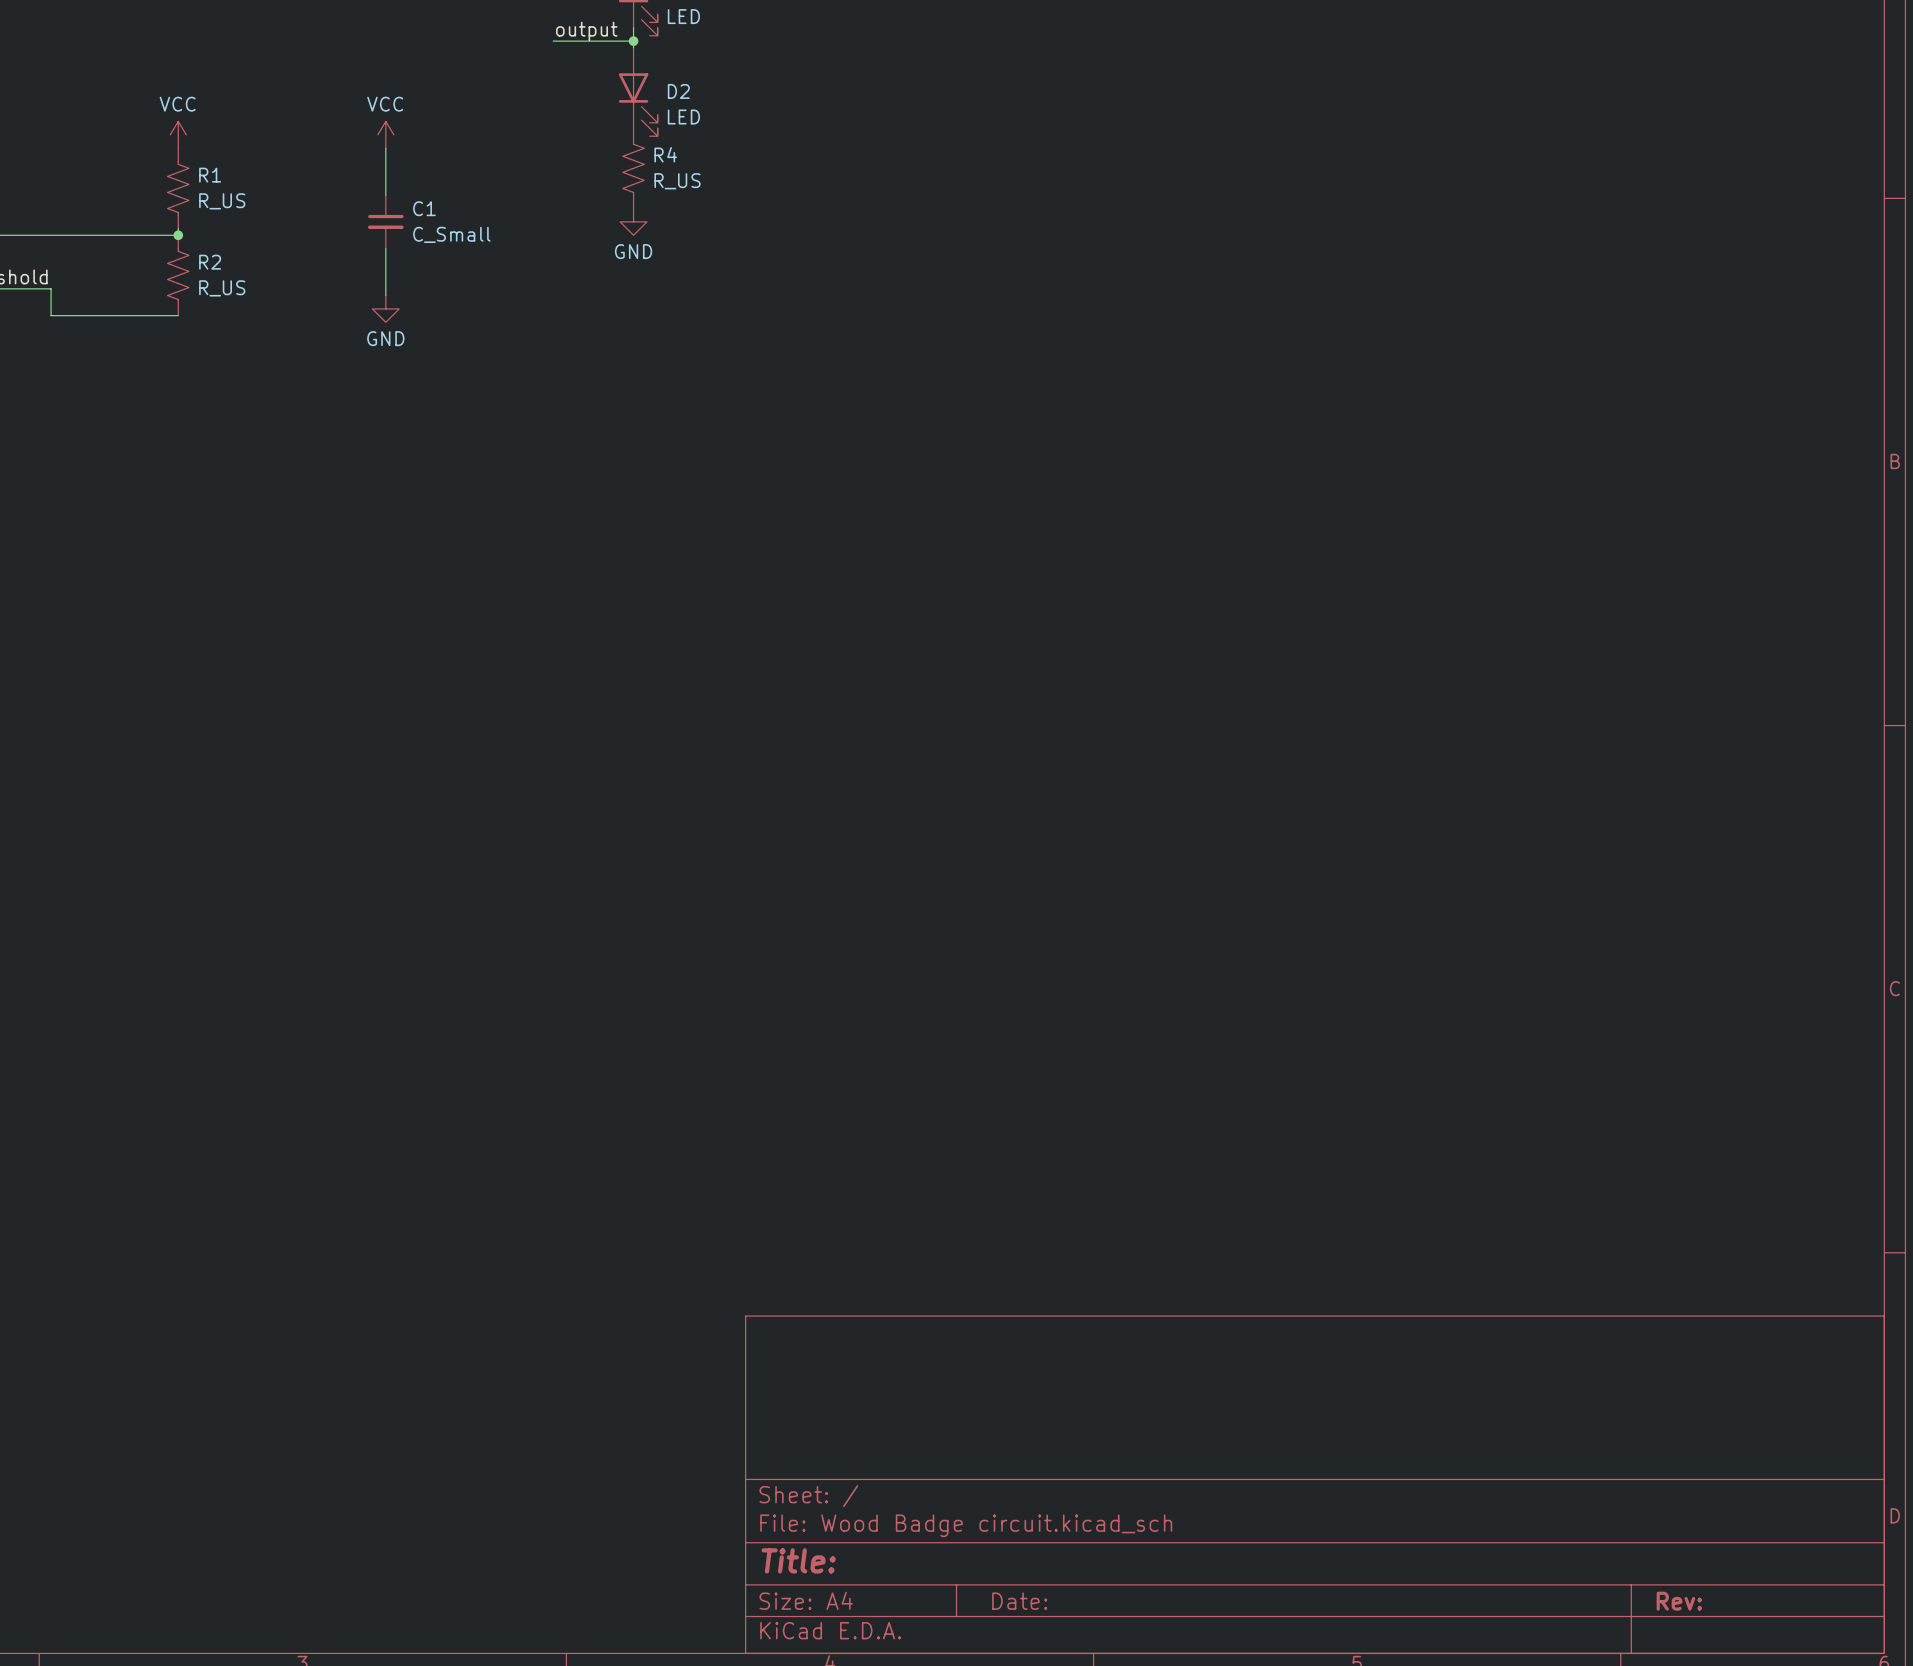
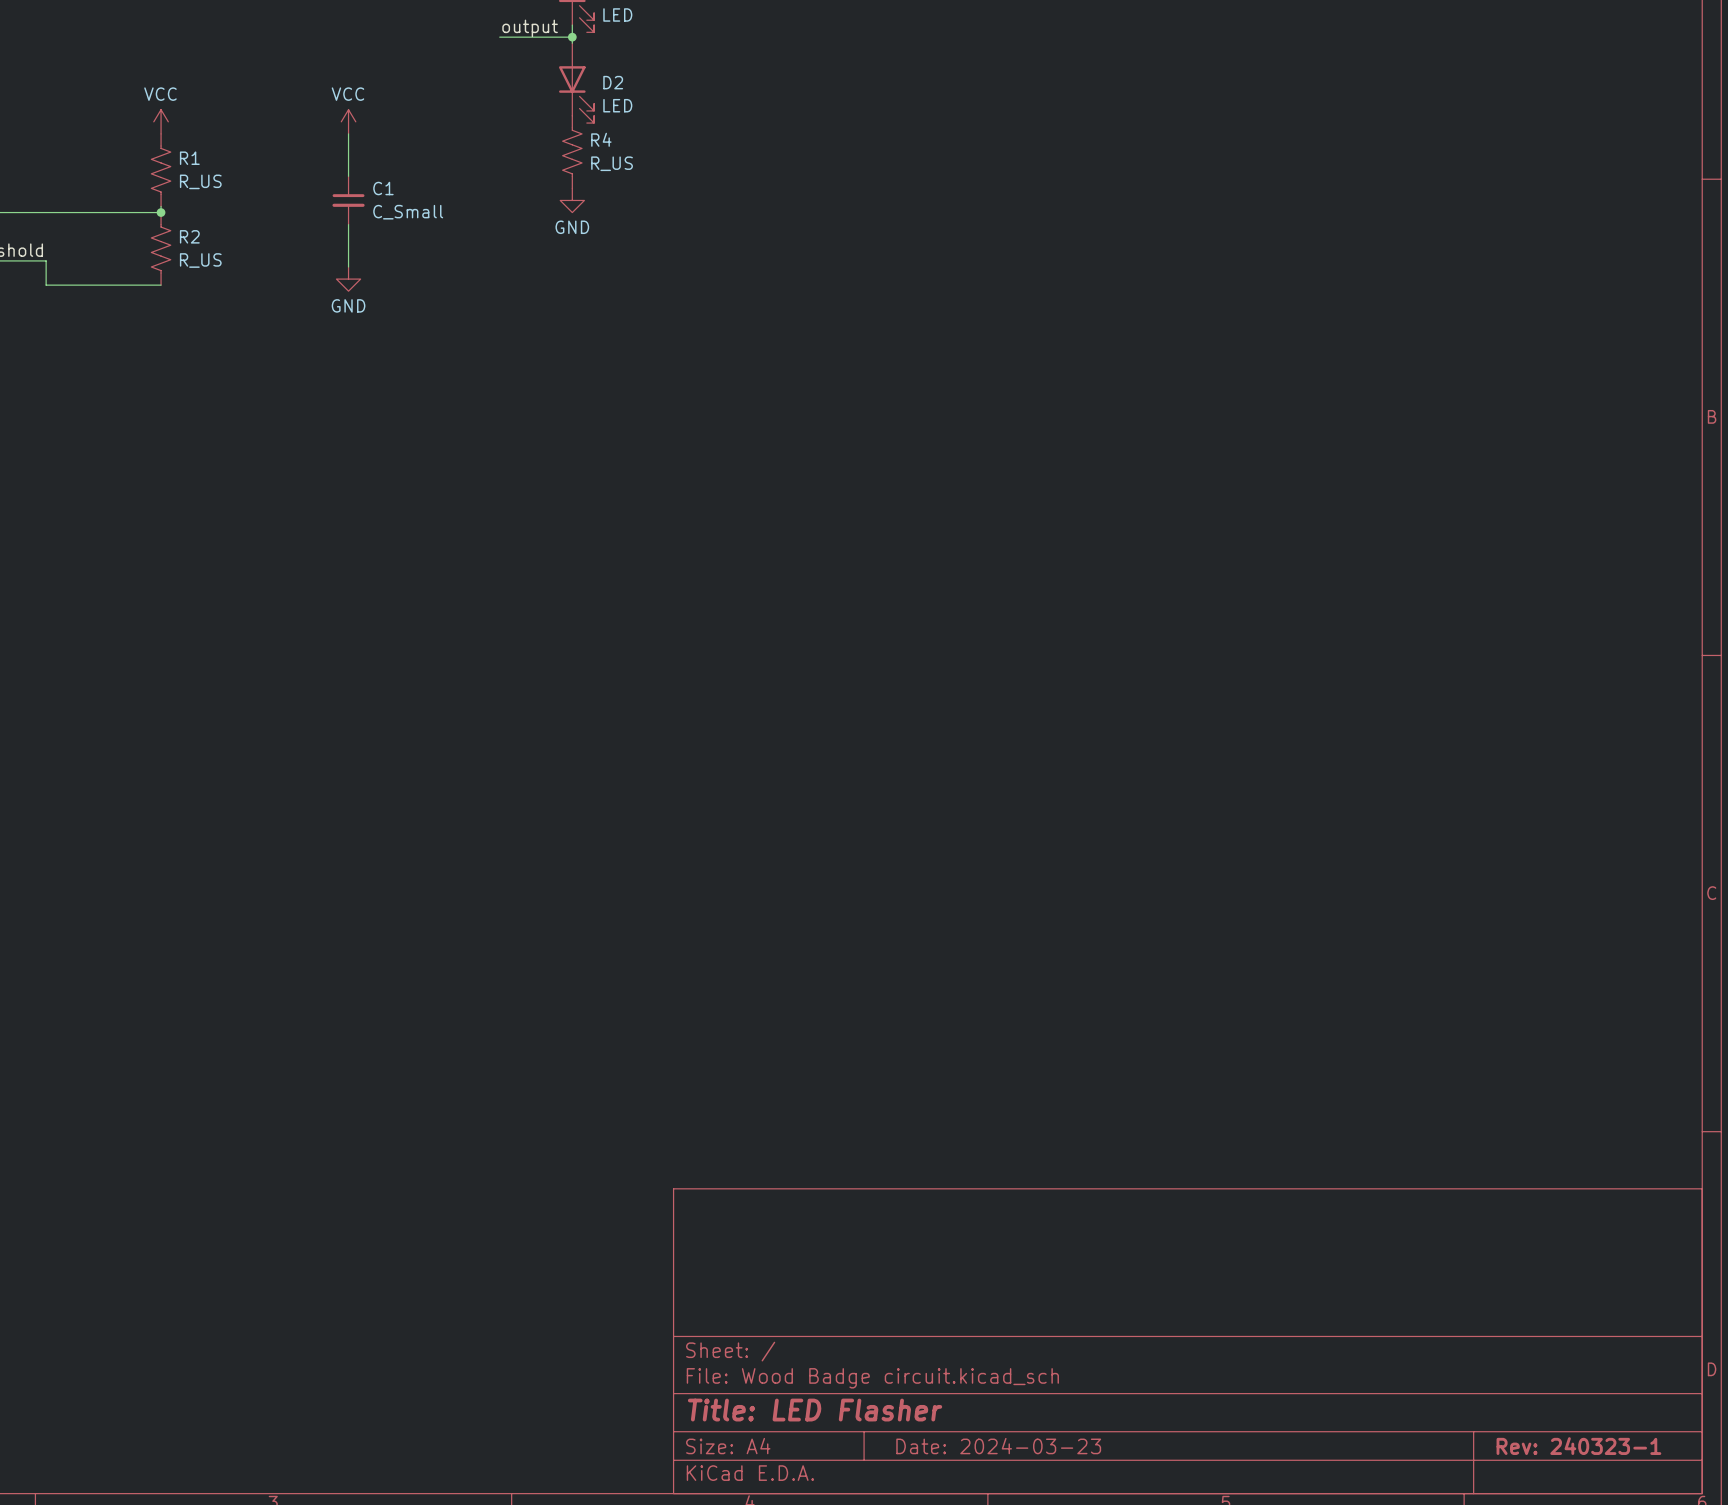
title block: Title: (798, 1560) -> Title: LED Flasher (815, 1410)
title block: Date: (1019, 1601) -> Date: 2024-03-23 (998, 1446)
title block: Rev: (1679, 1601) -> Rev: 240323-1 (1578, 1446)

